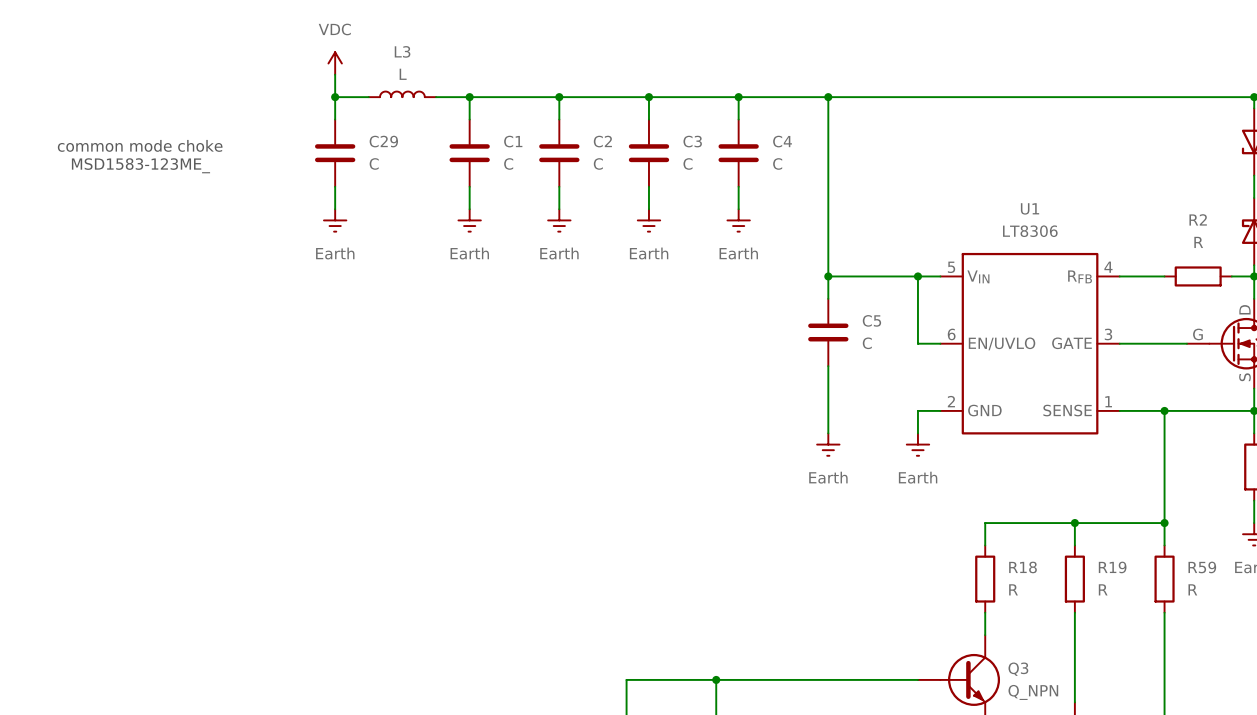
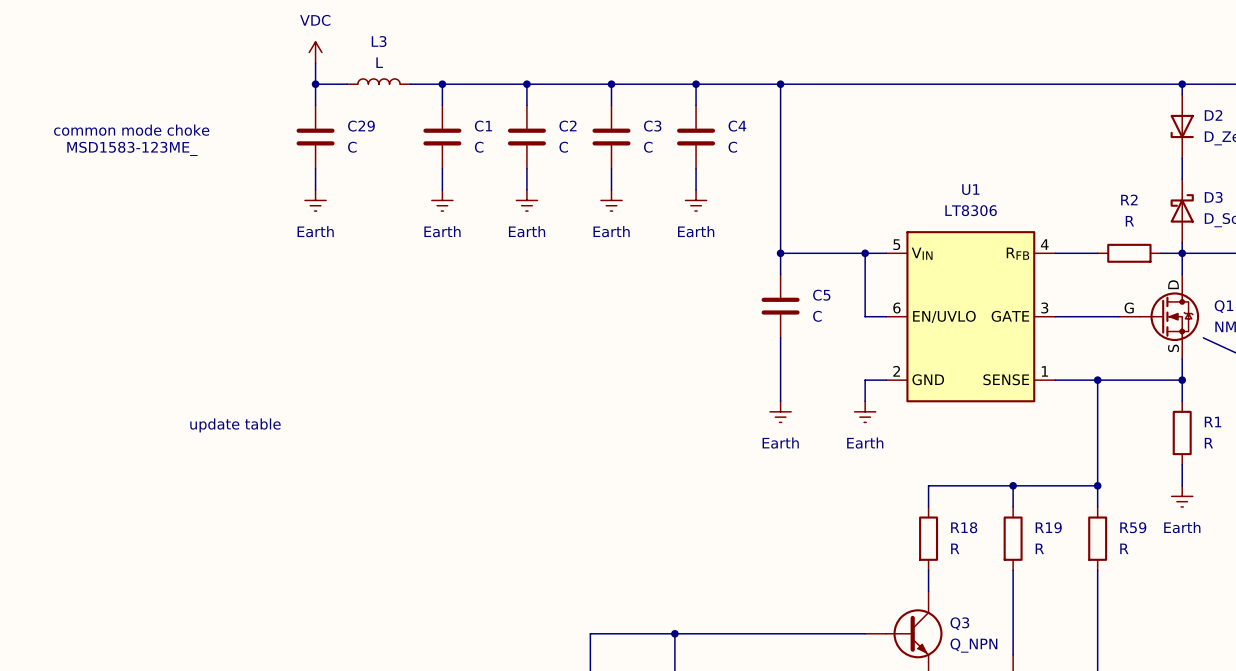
text: none -> update table (235, 425)

